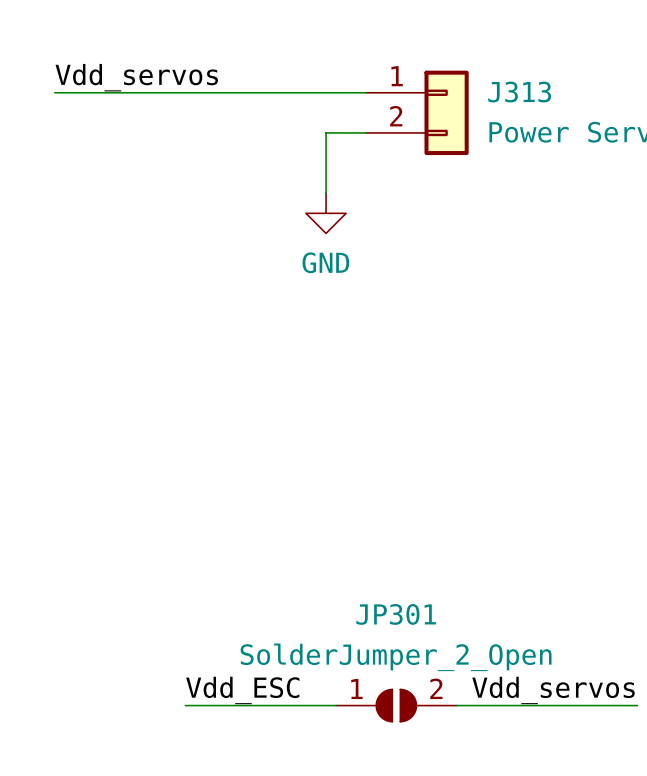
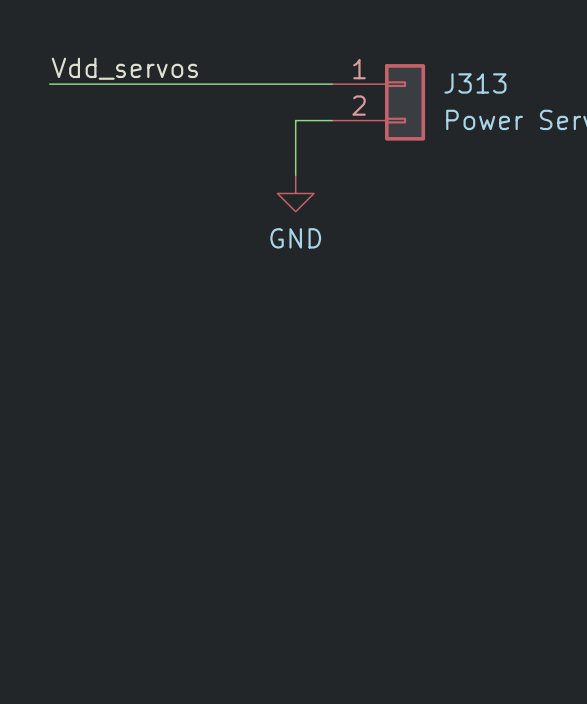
label: Vdd_ESC (242, 690) -> none
label: Vdd_servos (553, 690) -> none
wire: (185, 705) (336, 705) -> none
JP301: SolderJumper_2_Open (396, 705) -> none
wire: (456, 705) (637, 705) -> none

